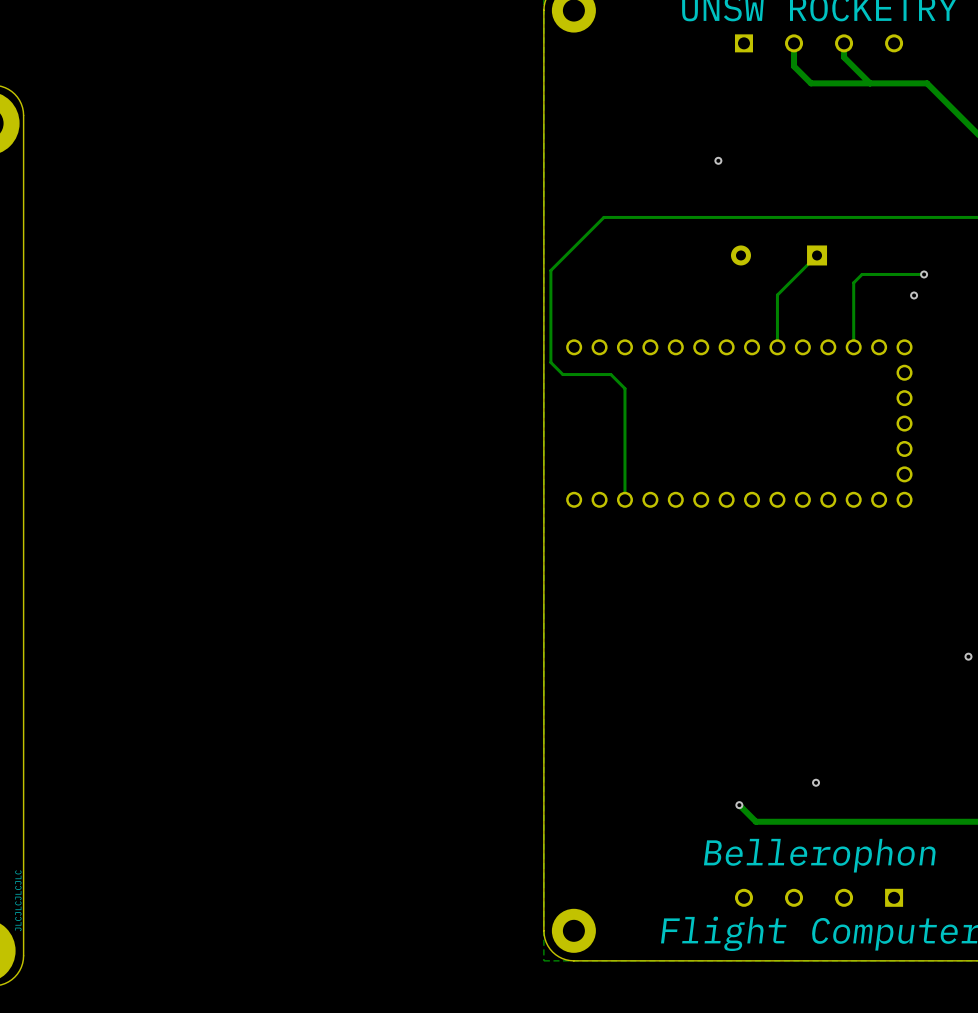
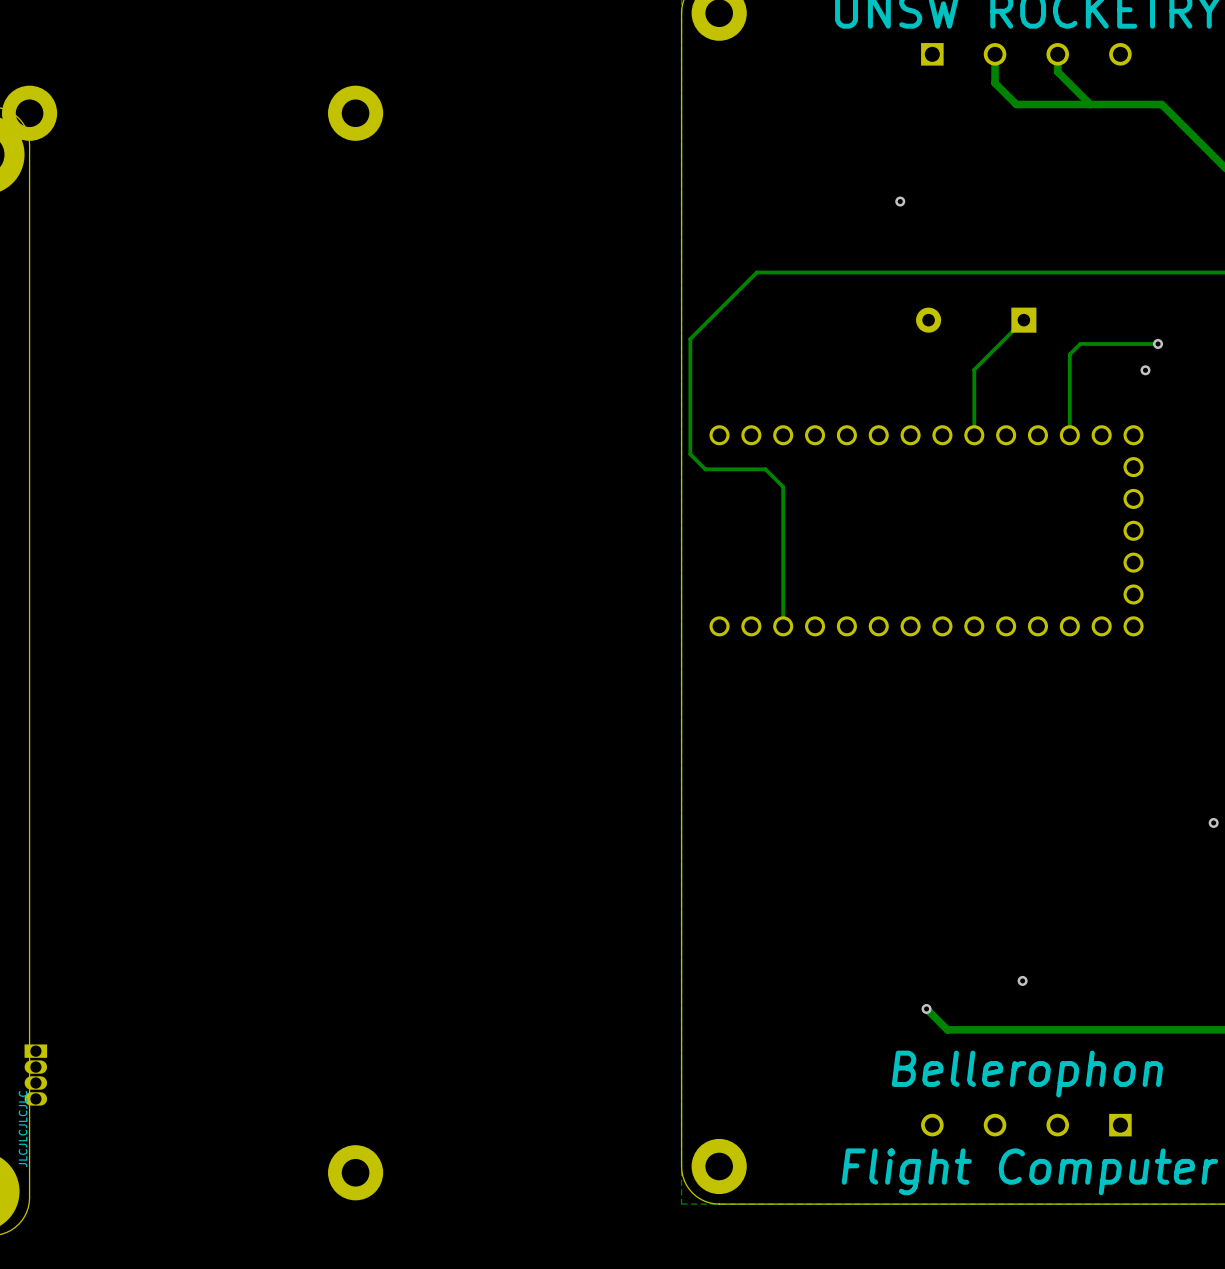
part: none -> (29, 113)
part: none -> (355, 113)
part: none -> (35, 1075)
part: none -> (355, 1172)

